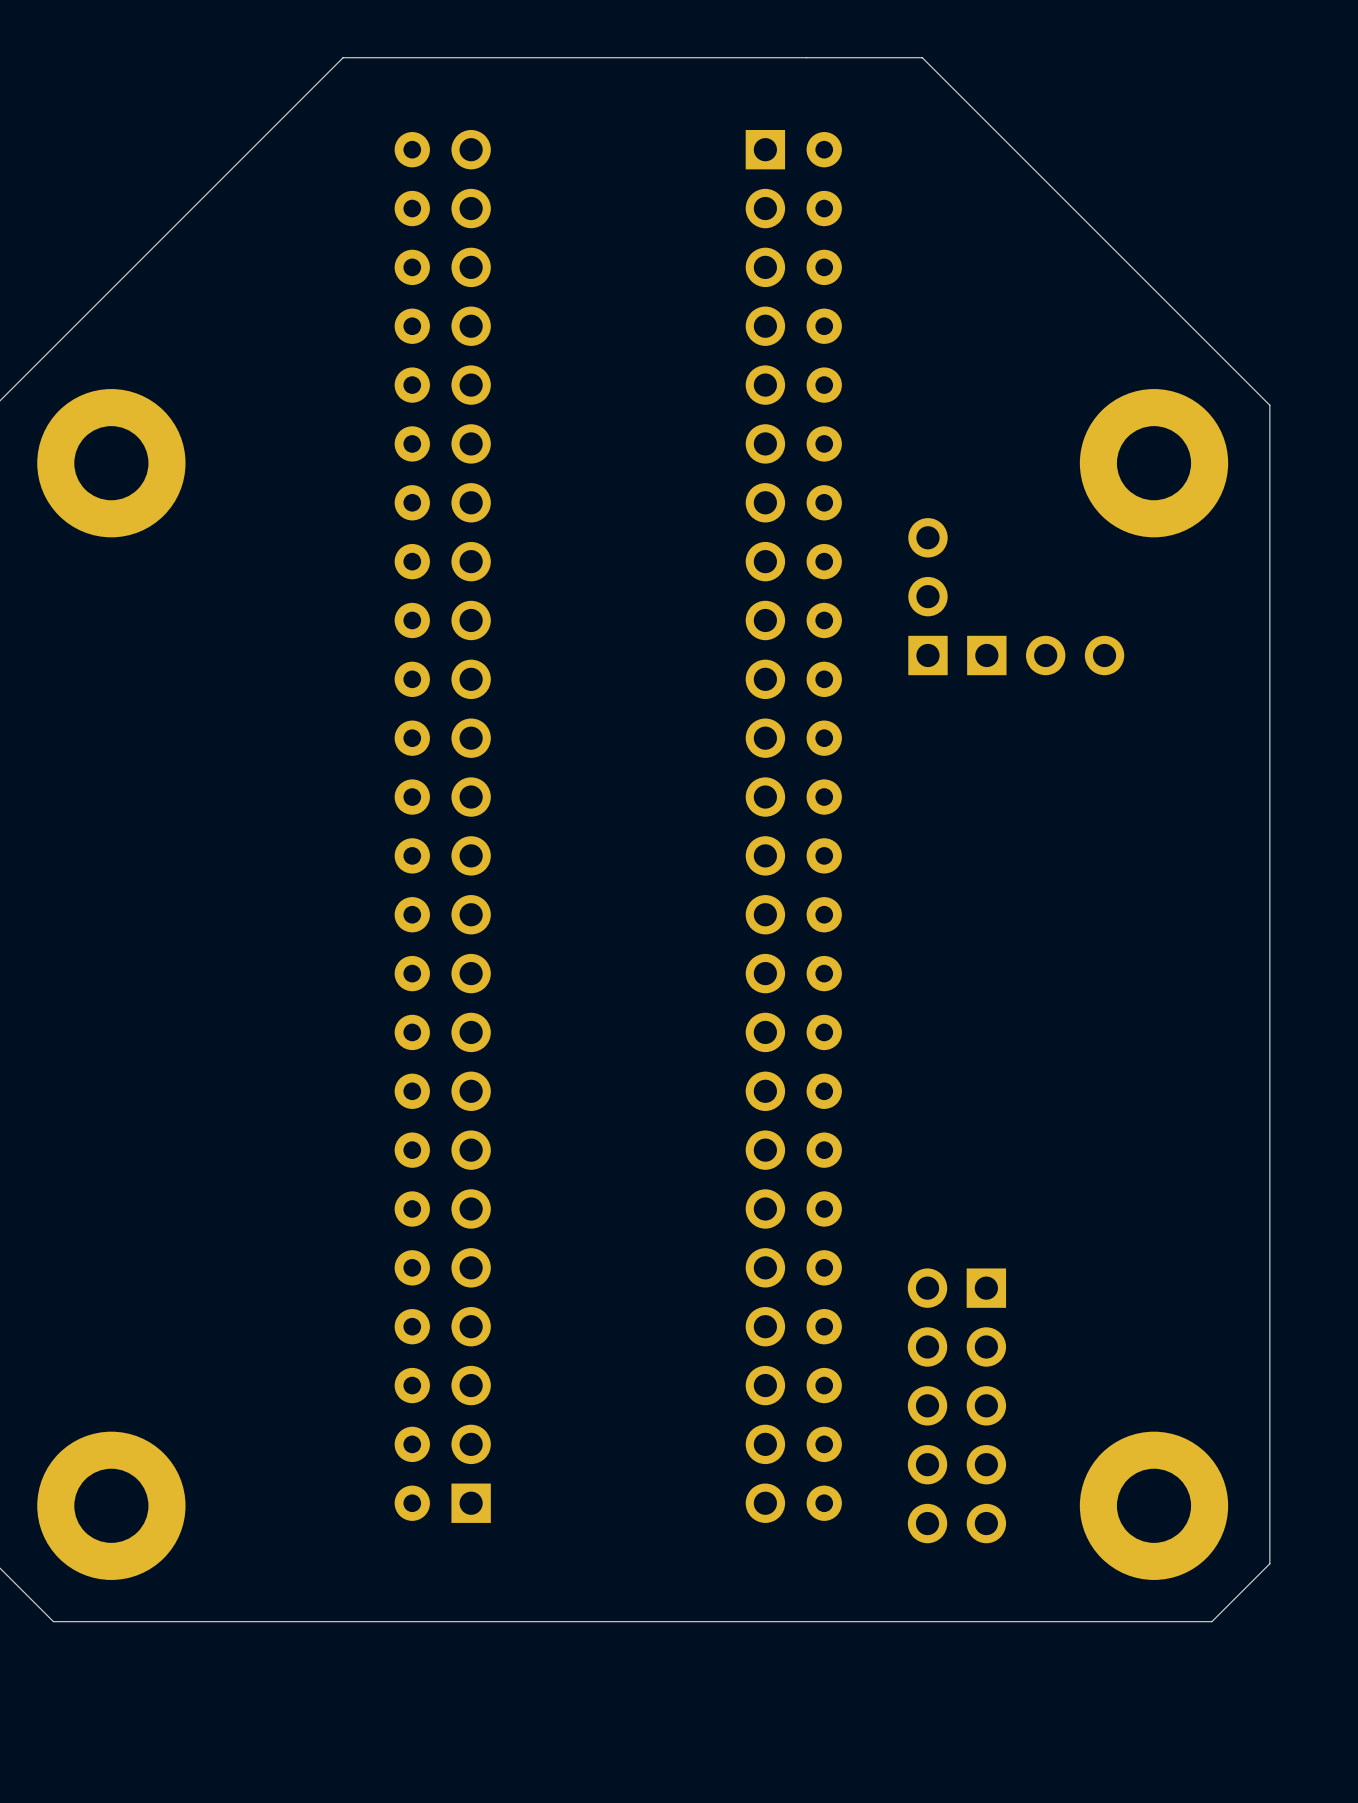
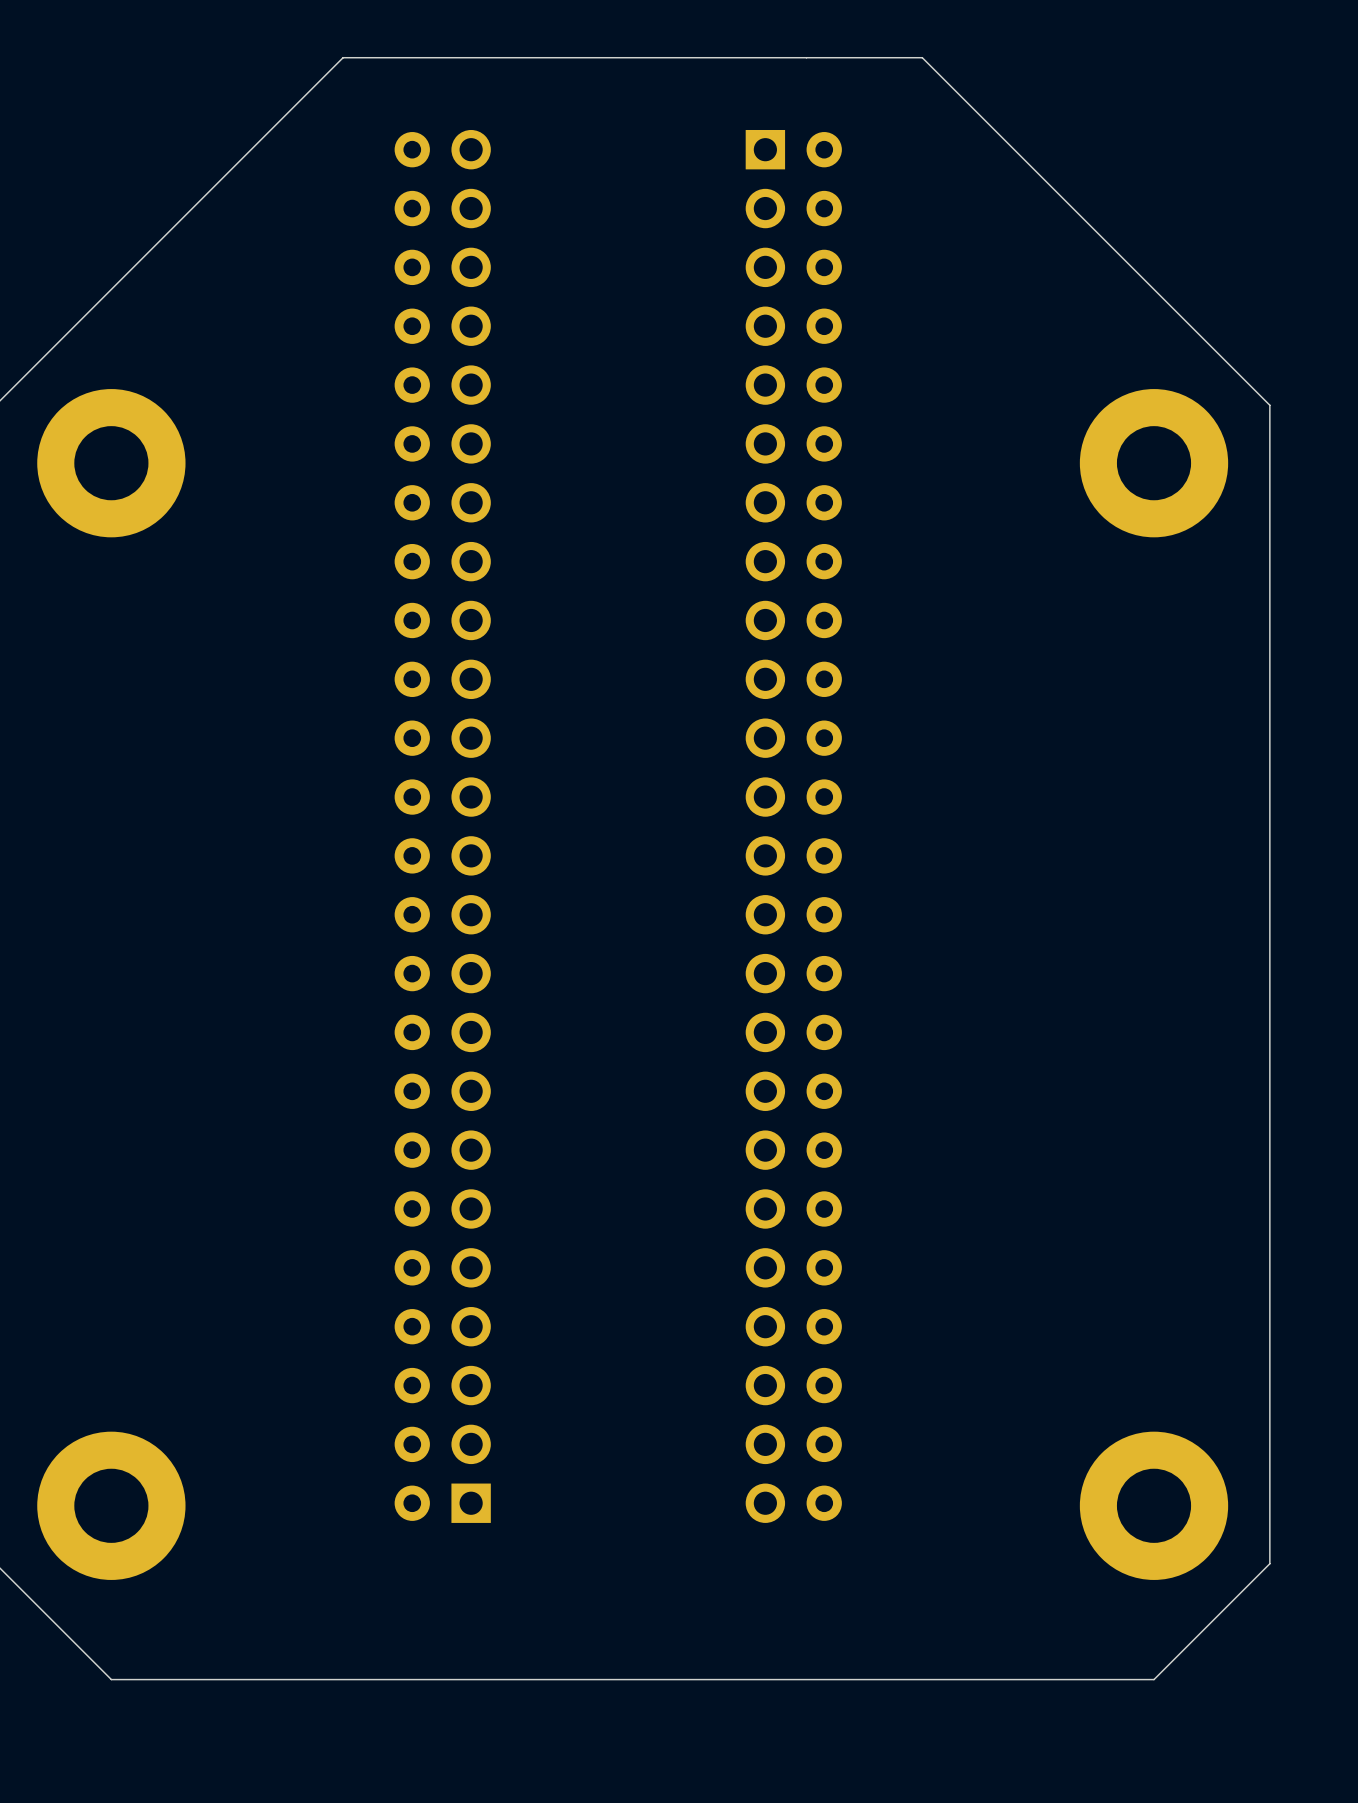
part: (927, 596) -> none
part: (1045, 655) -> none
part: (956, 1405) -> none
board edge: (1211, 1621) (53, 1621) -> (1211, 1621) (1154, 1679) (111, 1679) (53, 1621)

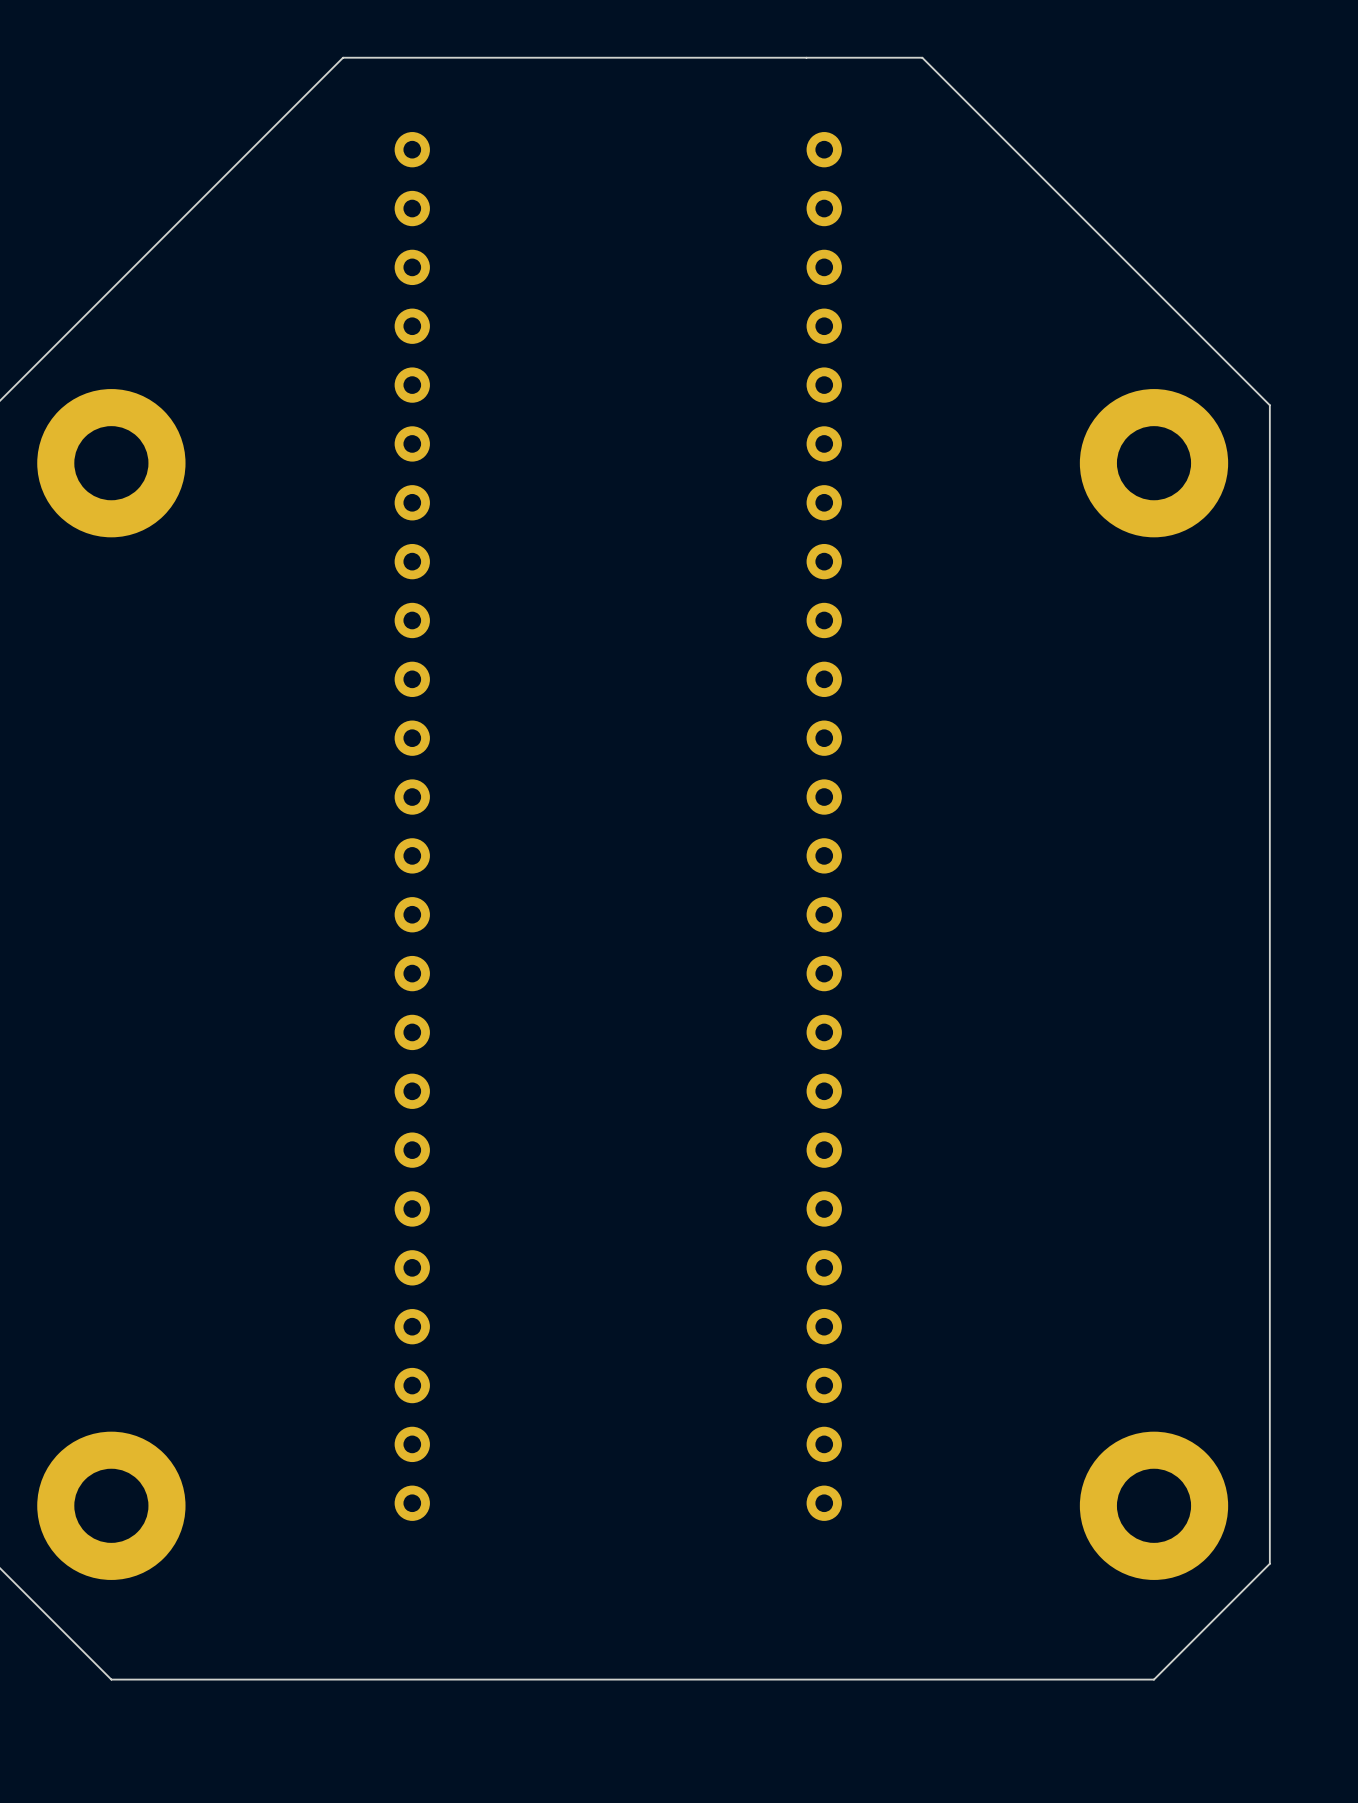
part: (471, 826) -> none
part: (765, 826) -> none

